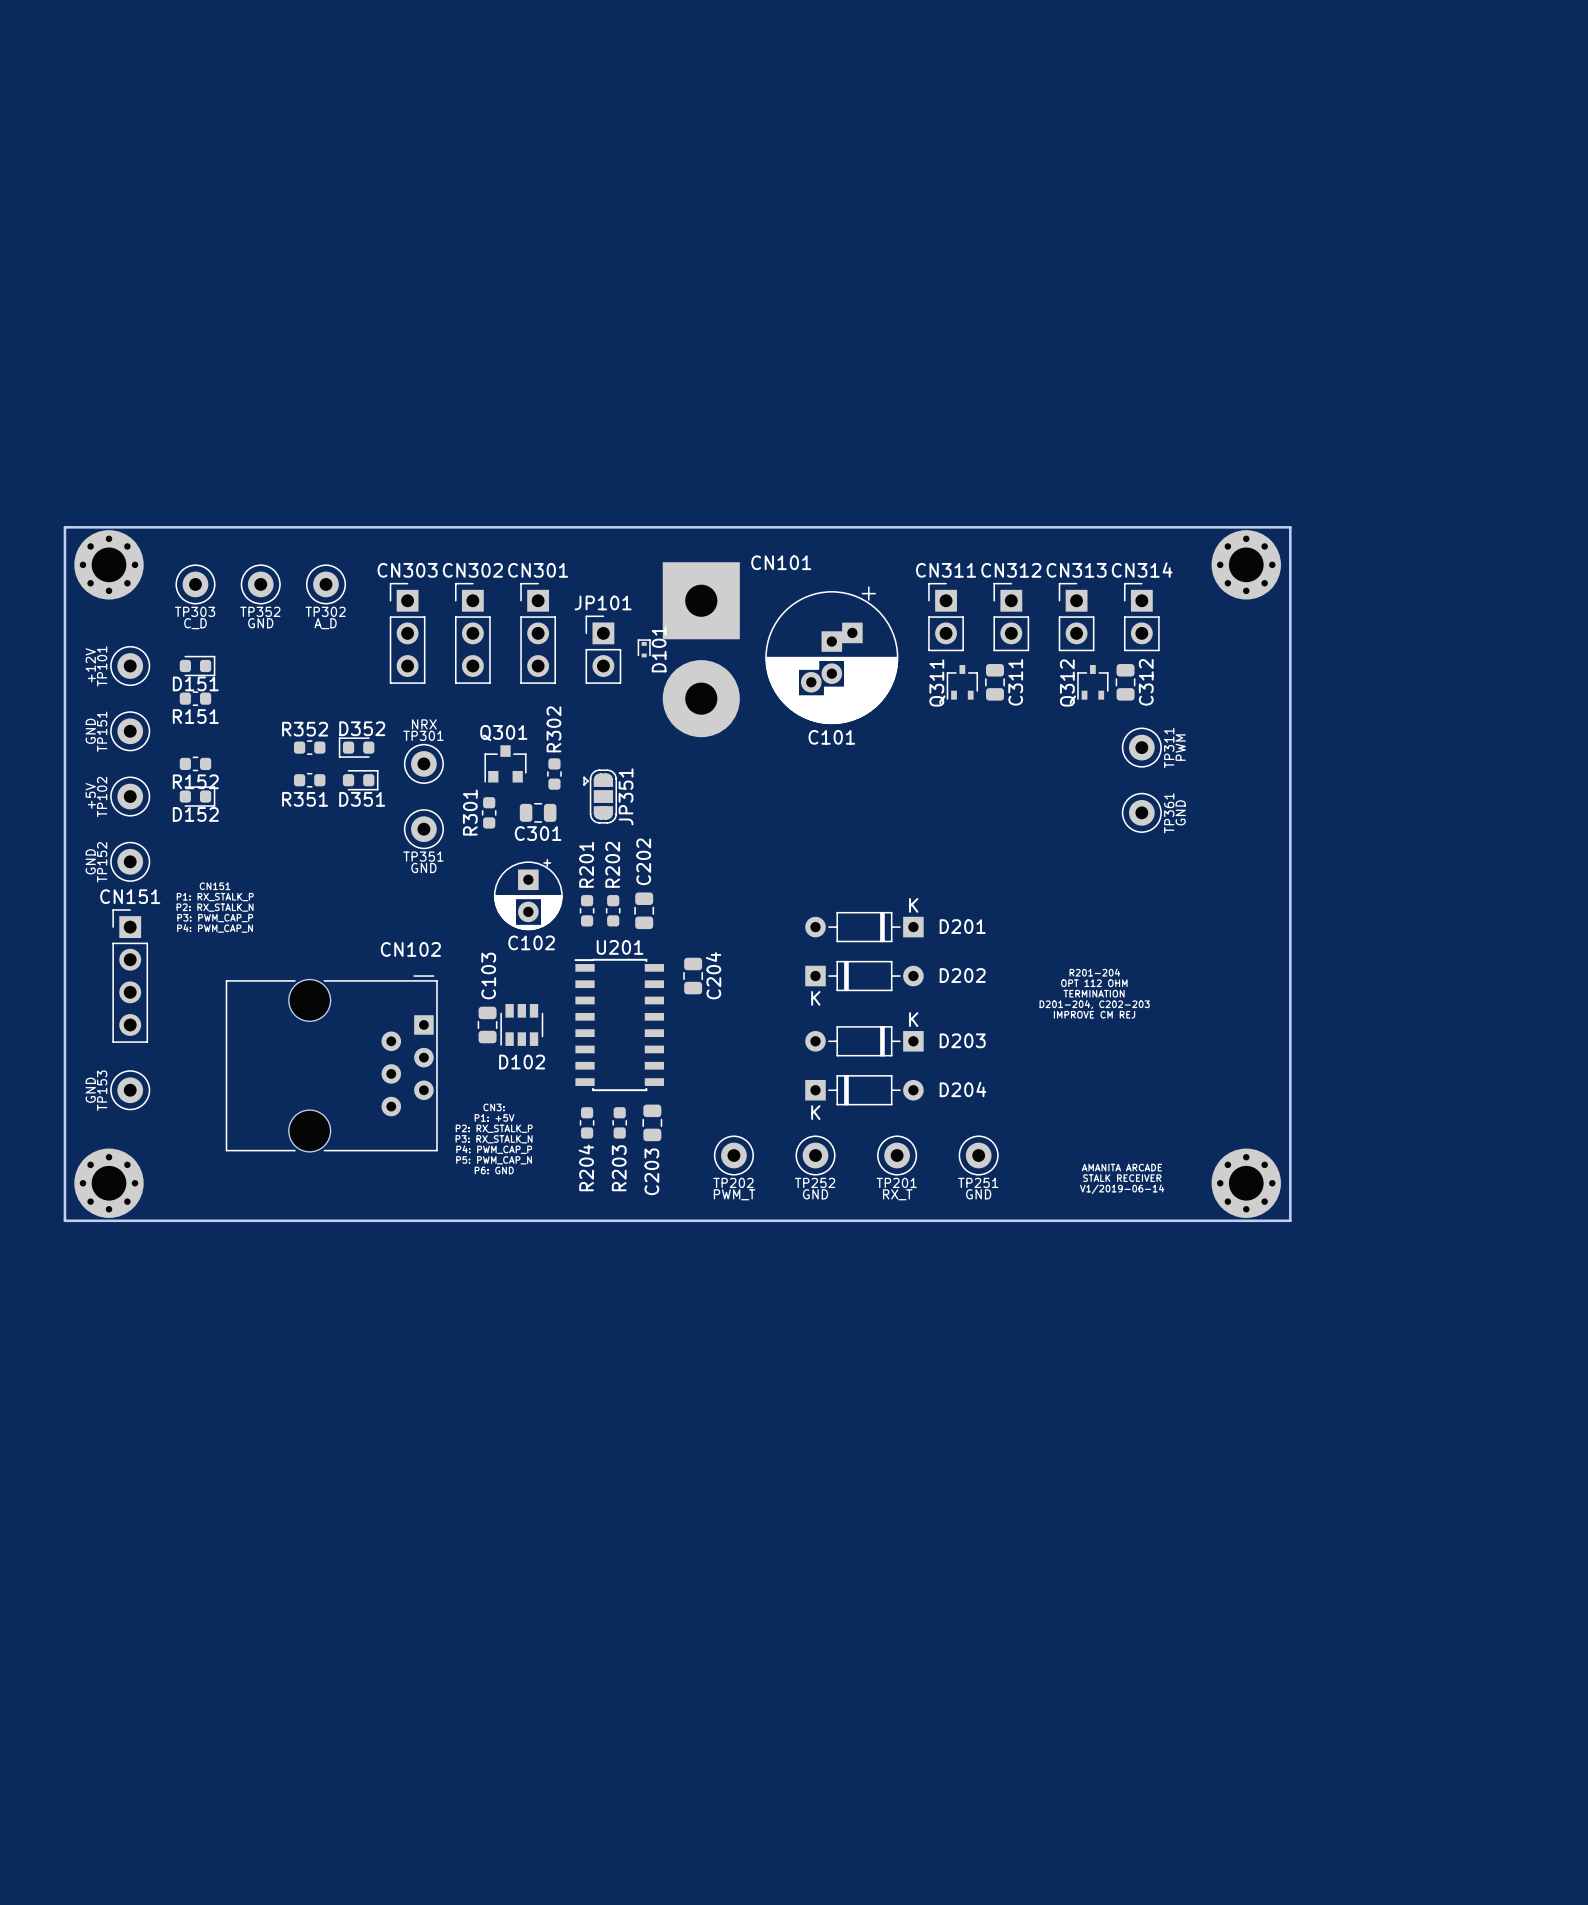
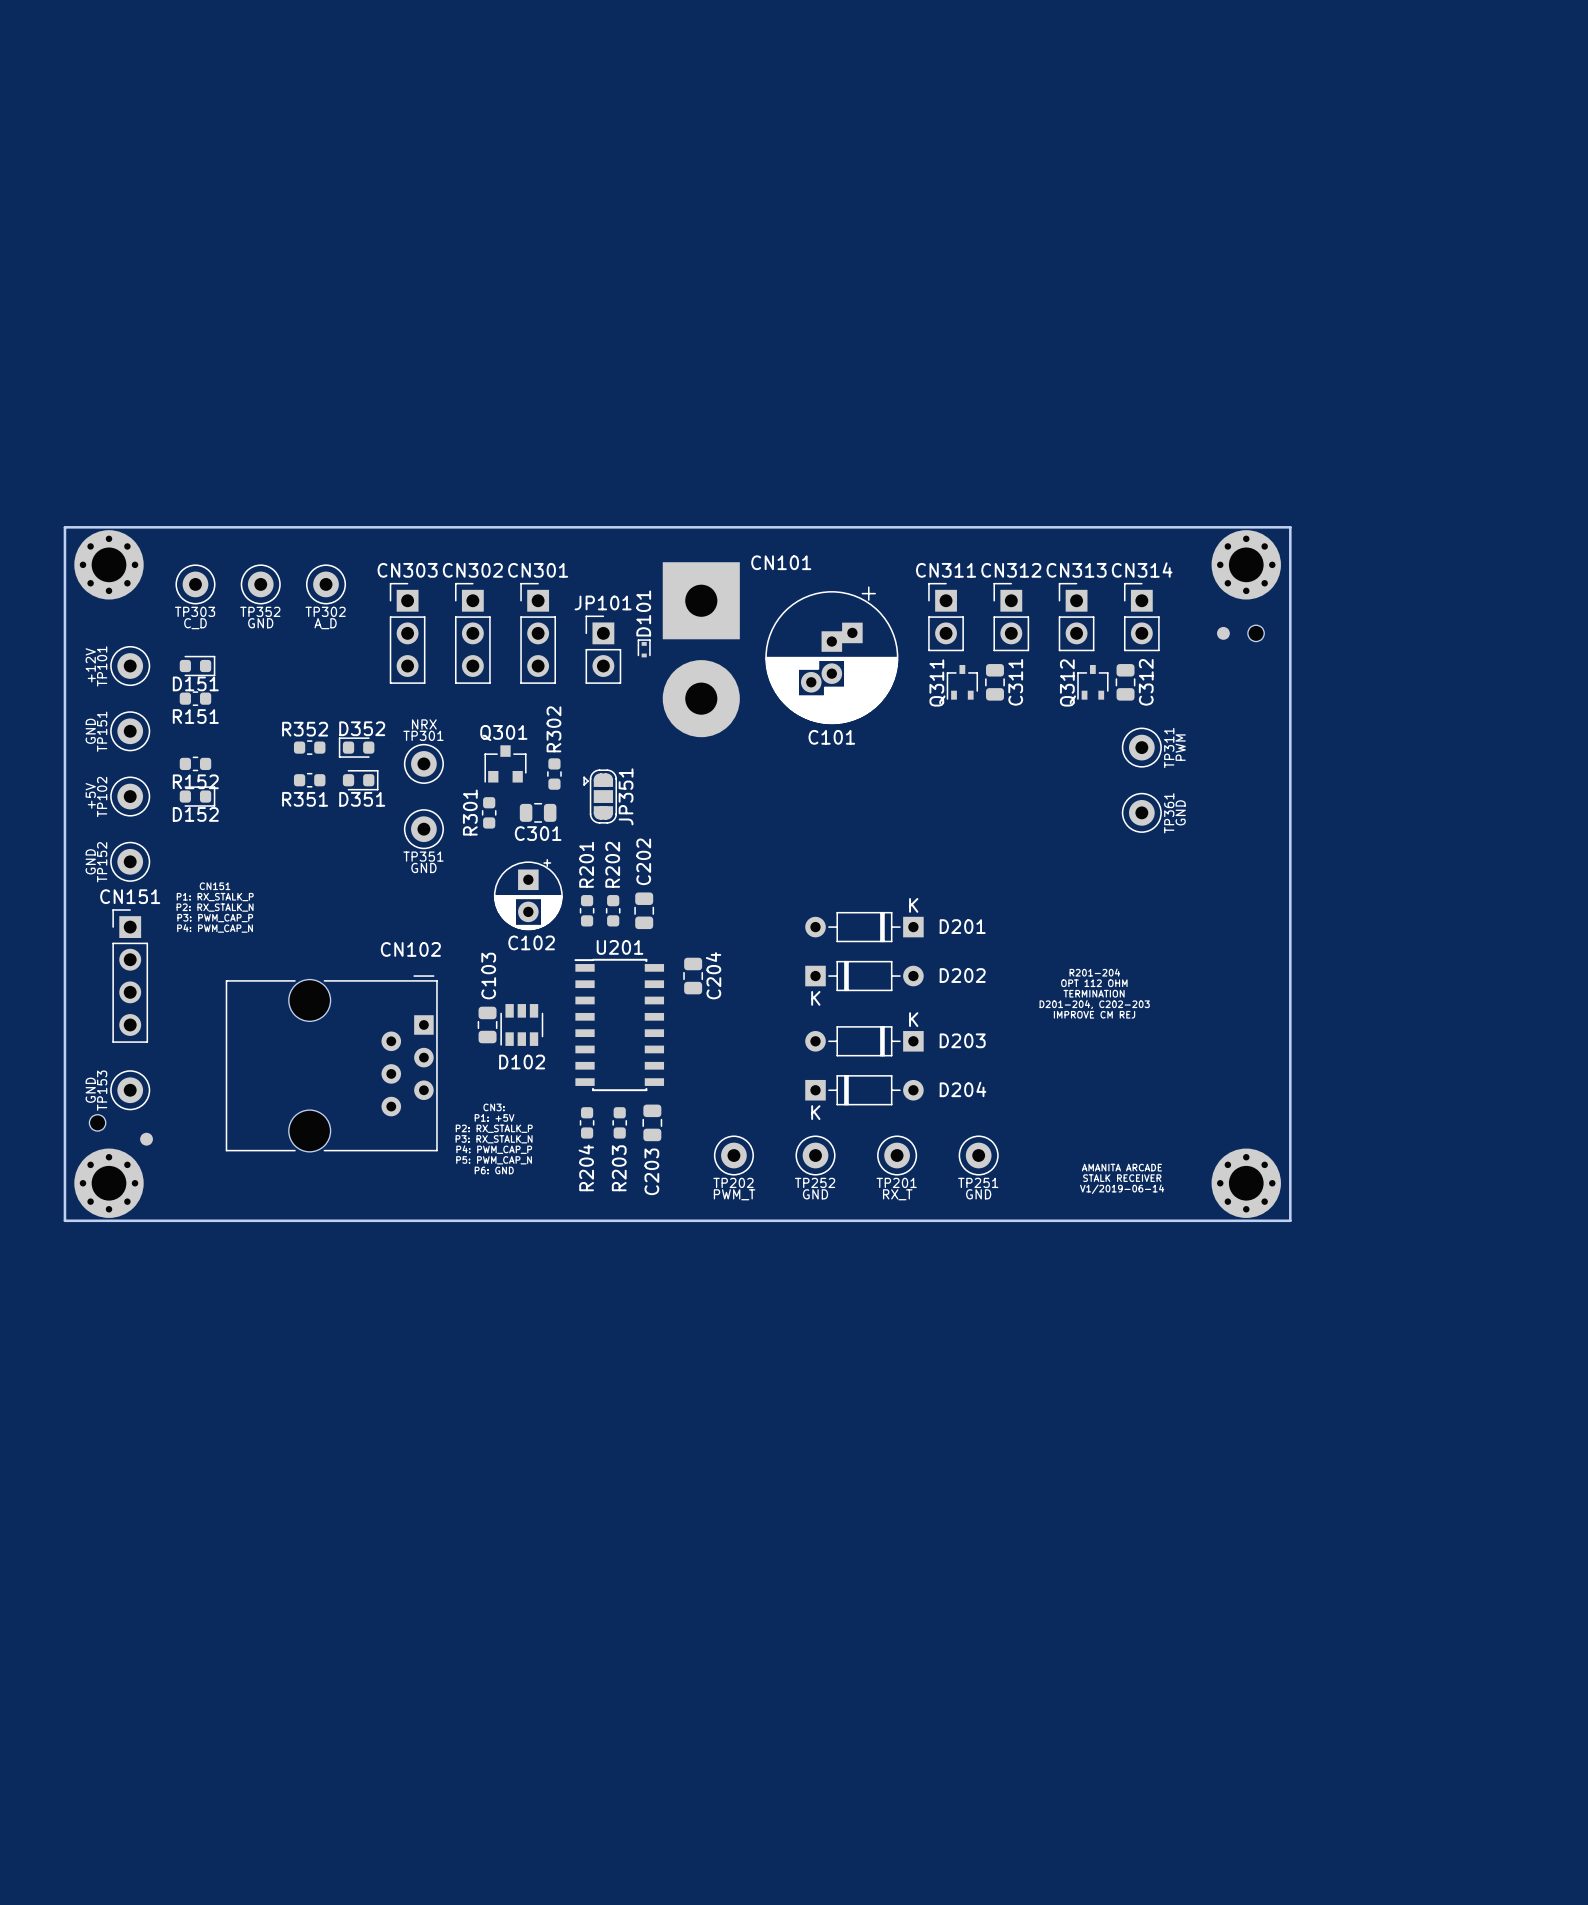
part: none -> (1223, 633)
part: none -> (1256, 633)
D101 name position: D101 (659, 649) -> D101 (643, 613)
part: none -> (97, 1122)
part: none -> (146, 1139)

